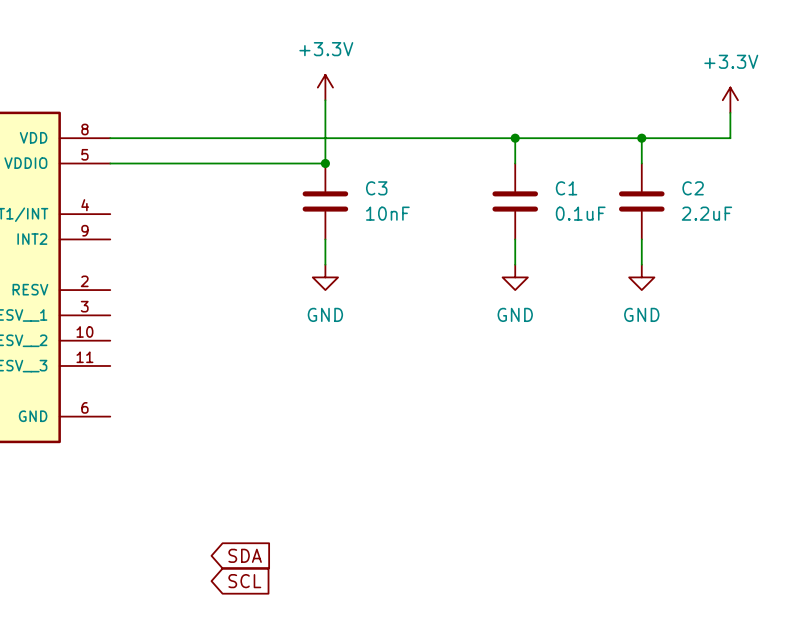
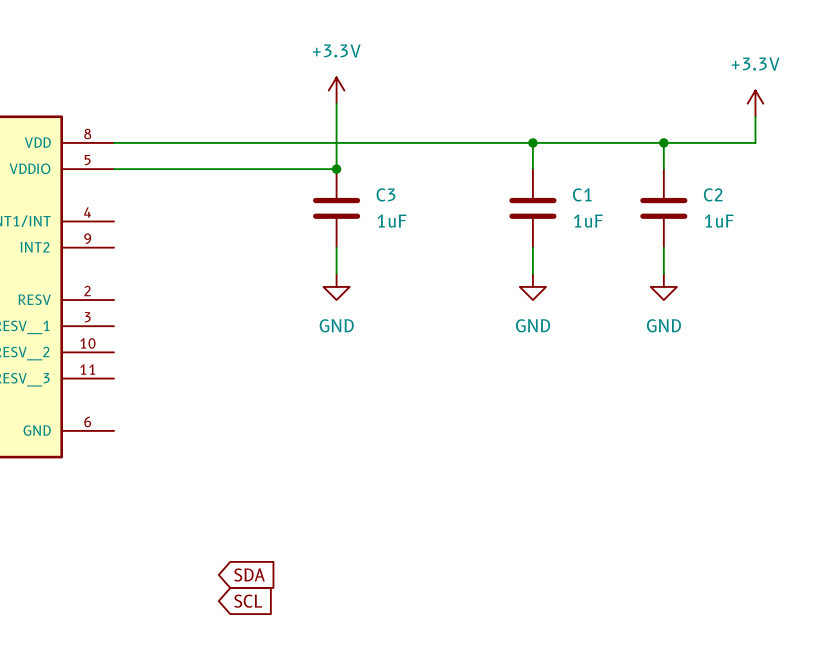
C3 value: 10nF (387, 213) -> 1uF (391, 221)
C1 value: 0.1uF (580, 213) -> 1uF (588, 221)
C2 value: 2.2uF (706, 213) -> 1uF (719, 221)

